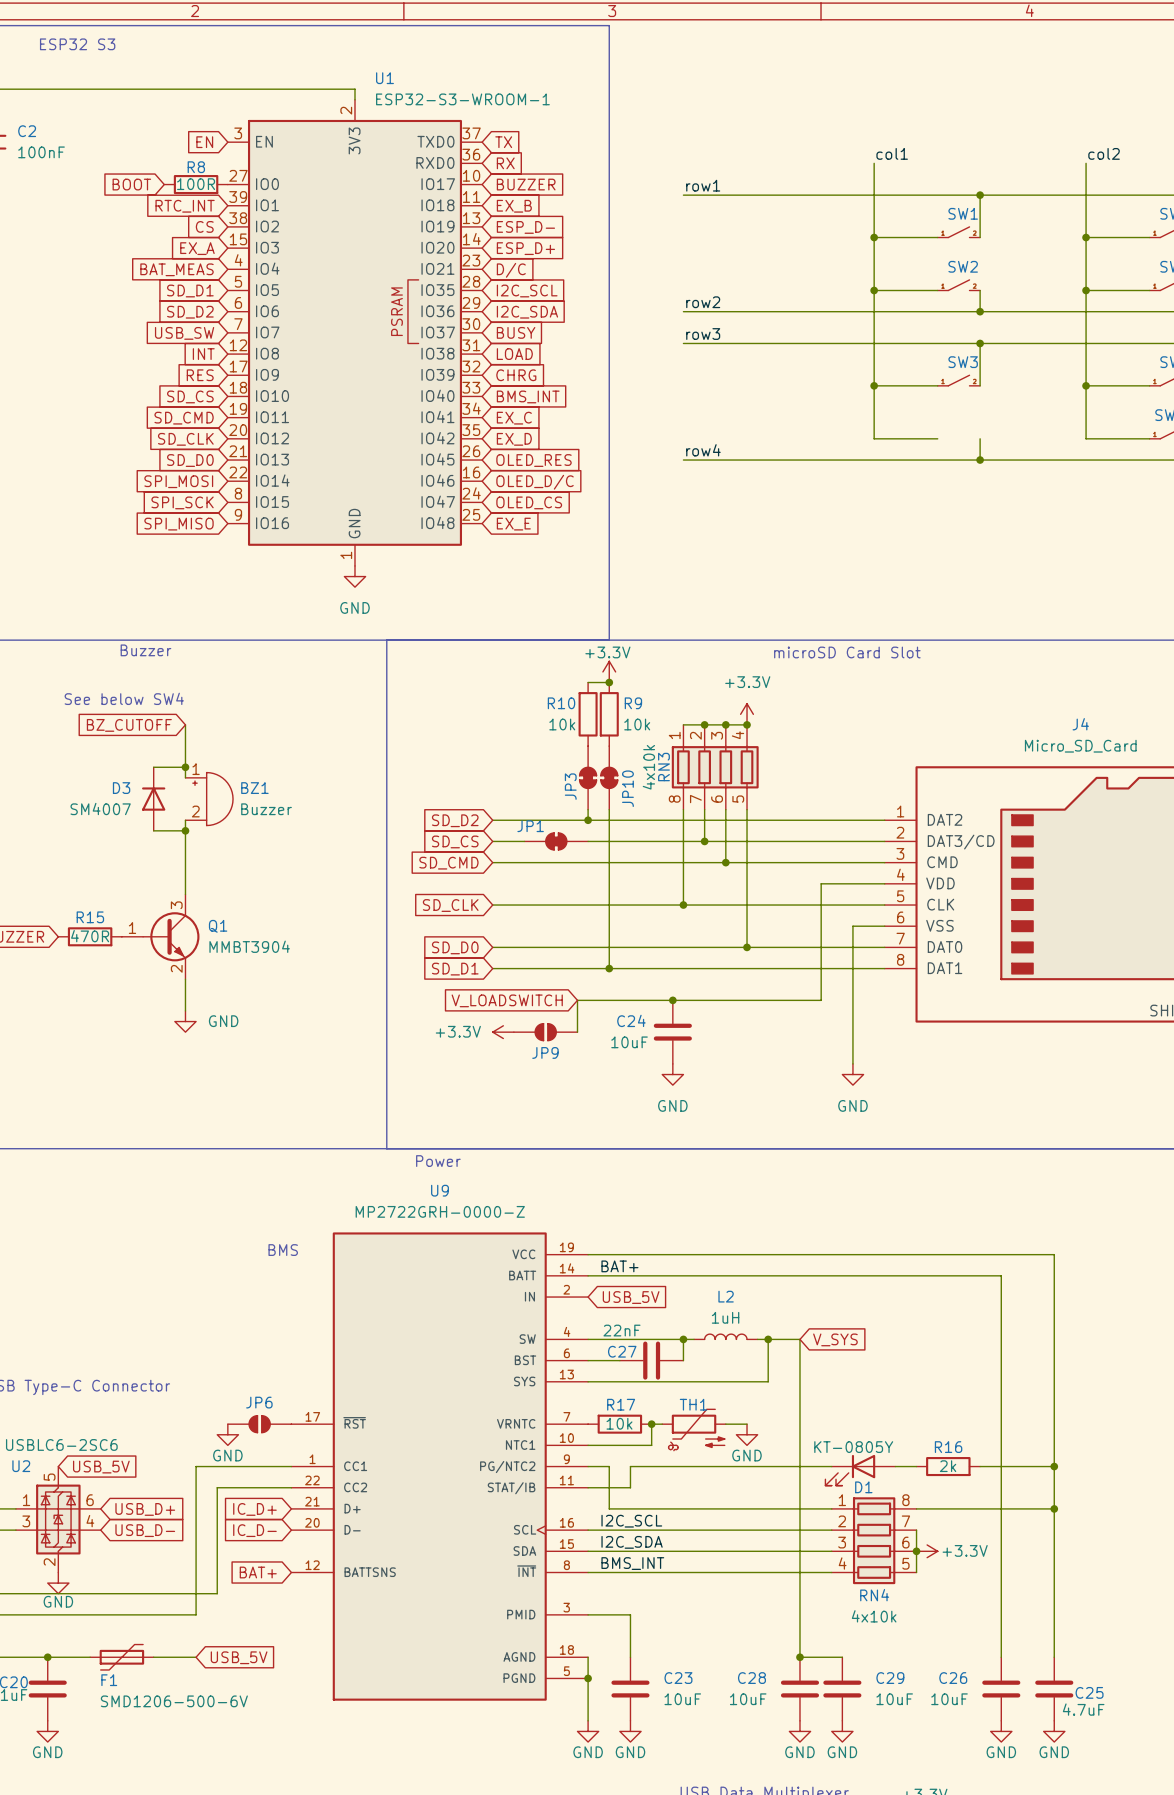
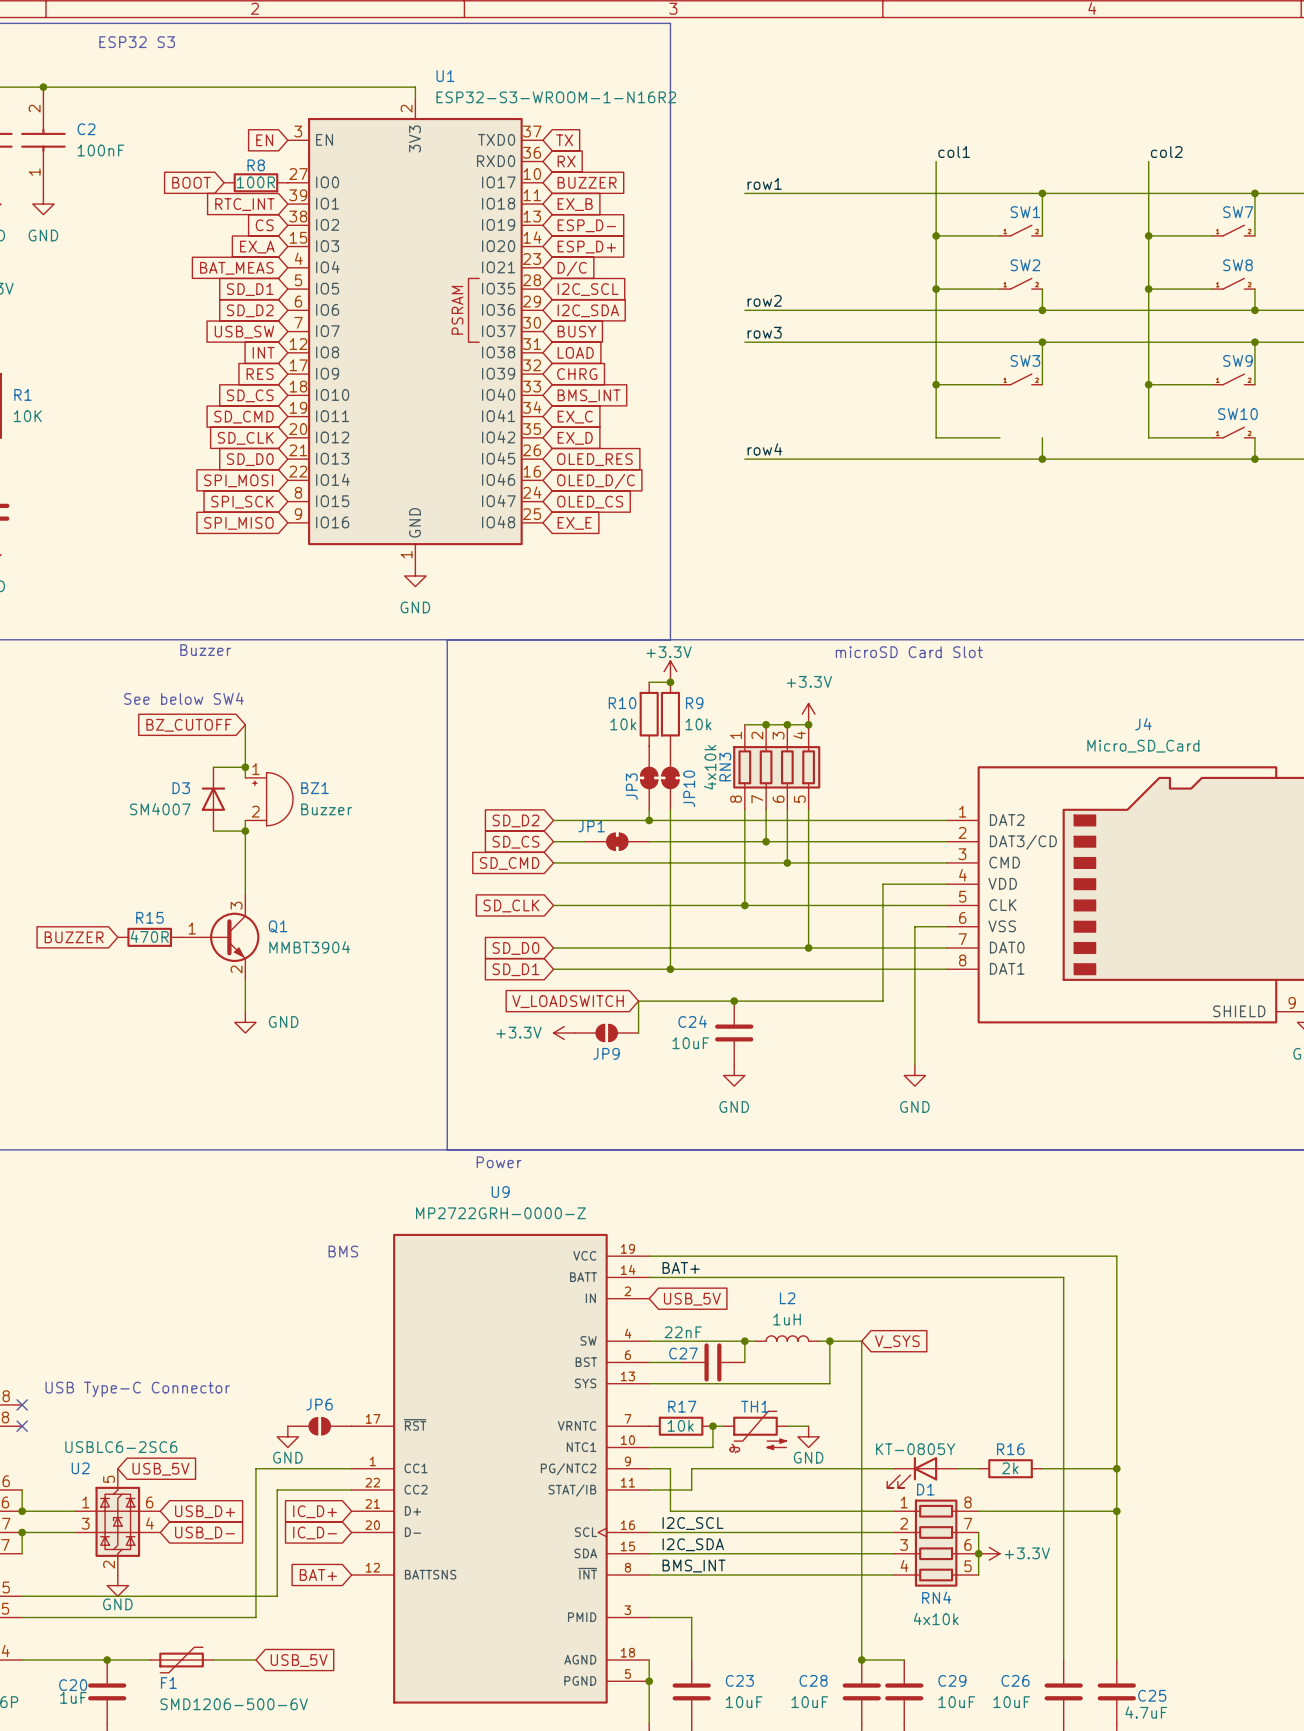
U1 value: ESP32-S3-WROOM-1 (462, 99) -> ESP32-S3-WROOM-1-N16R2 (556, 97)

